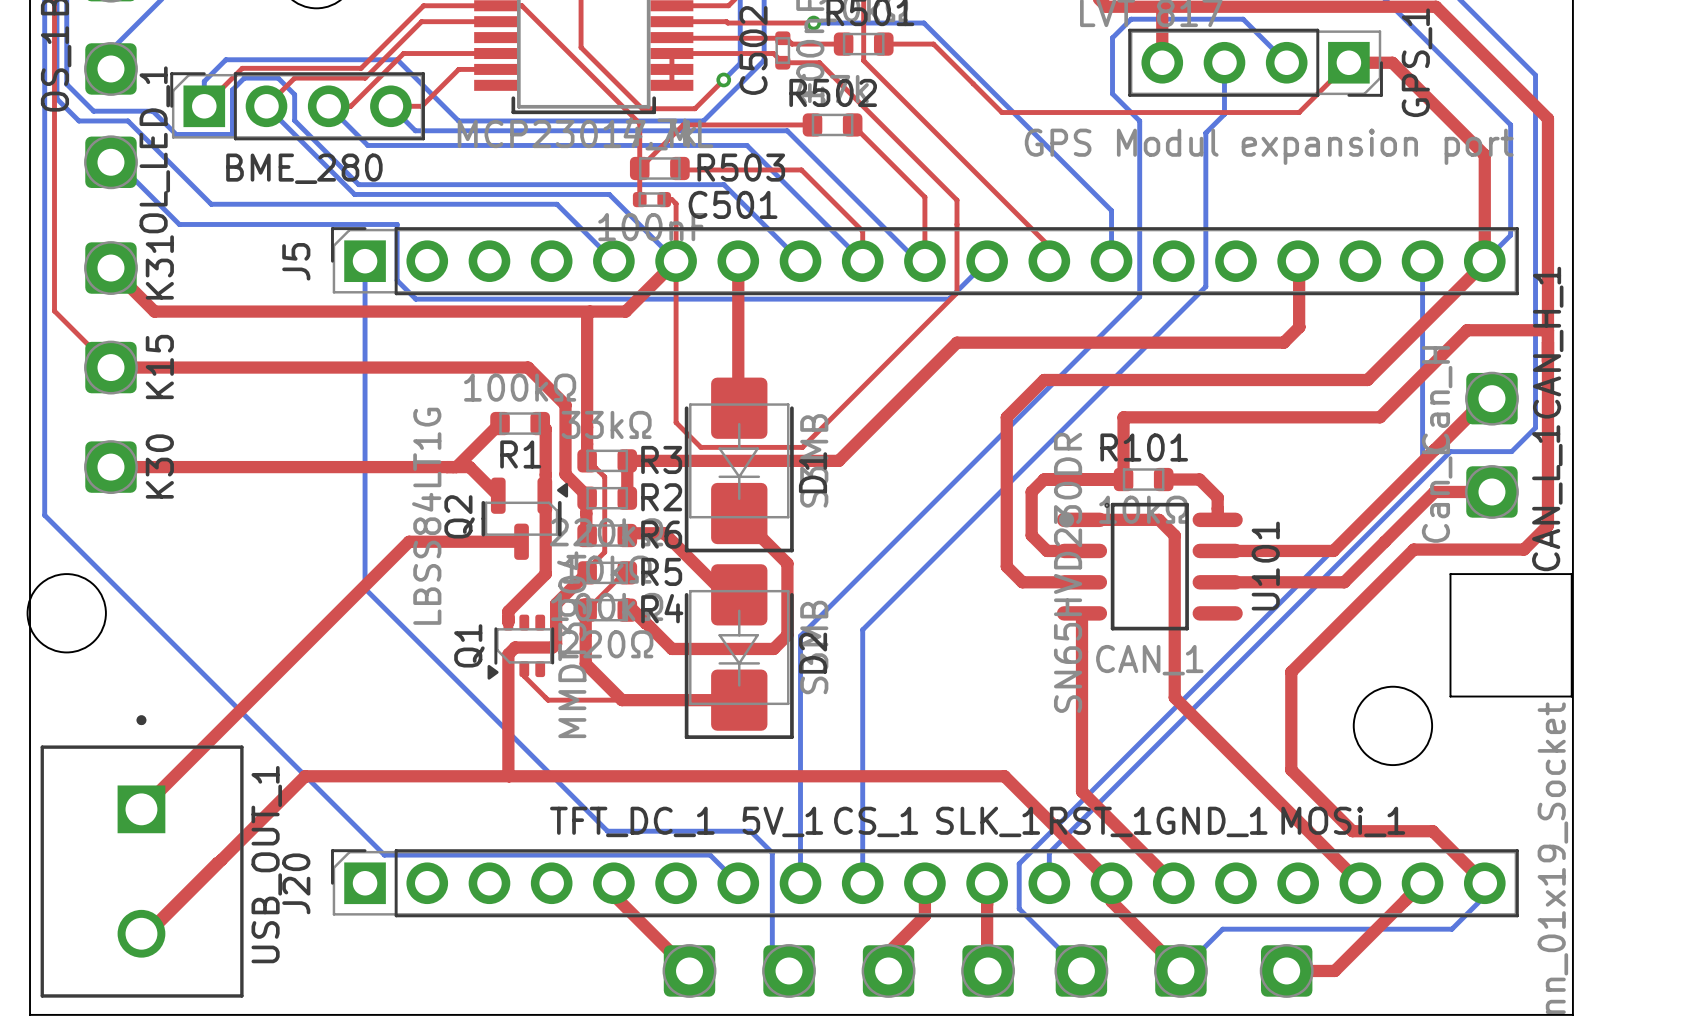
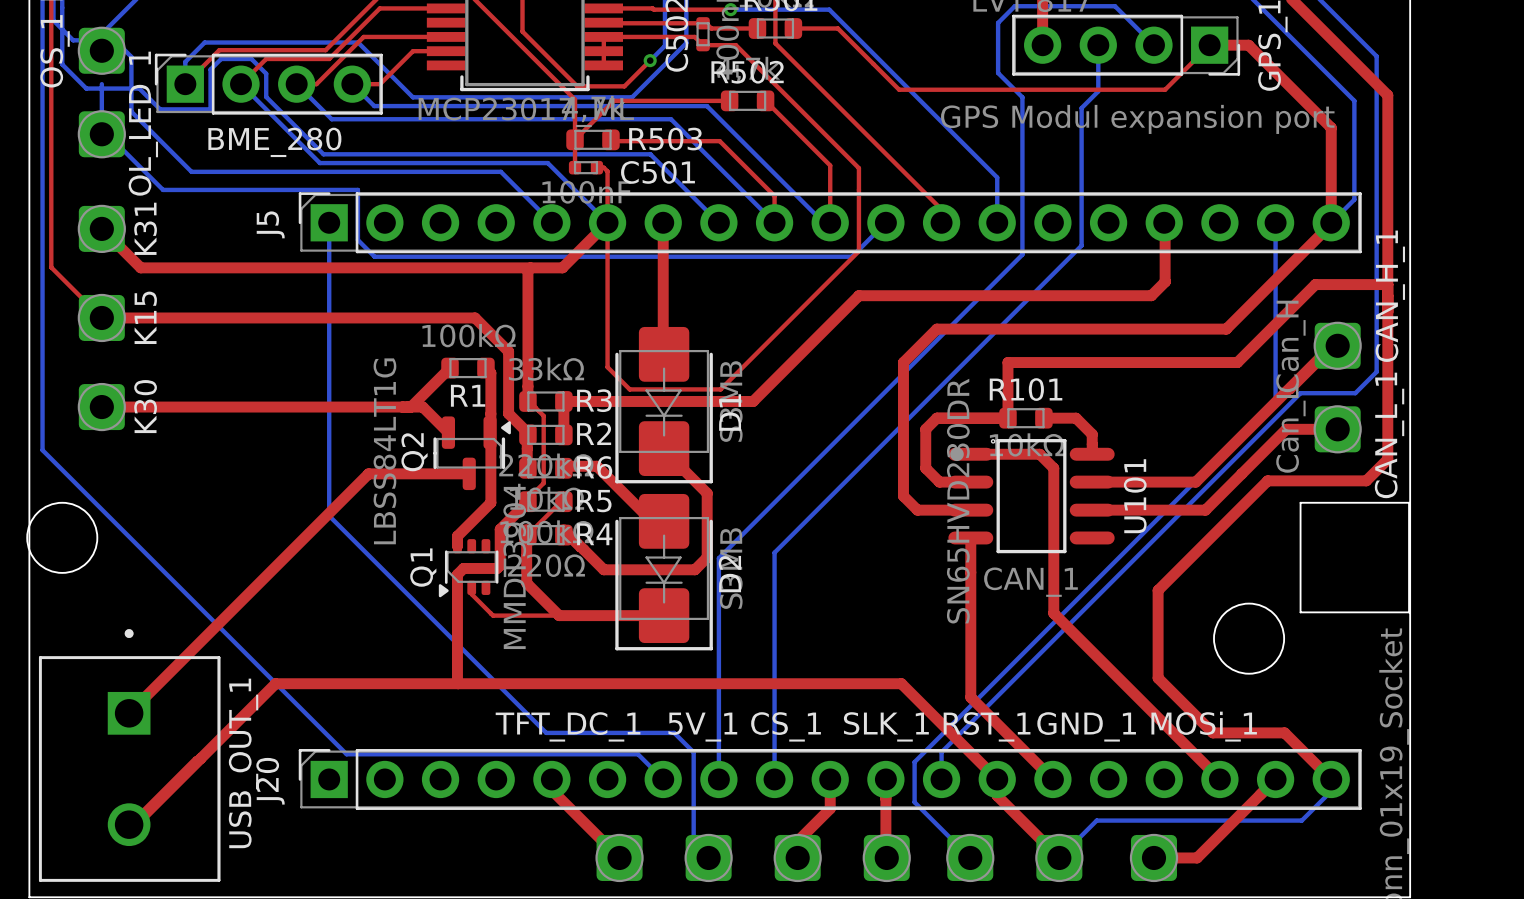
bottom track: (56, 35) (56, 98) (78, 120) (127, 120) (144, 137) -> (53, 20) (73, 40) (114, 40) (131, 56) (131, 111)
bottom track: none -> (101, 84) (101, 128)

